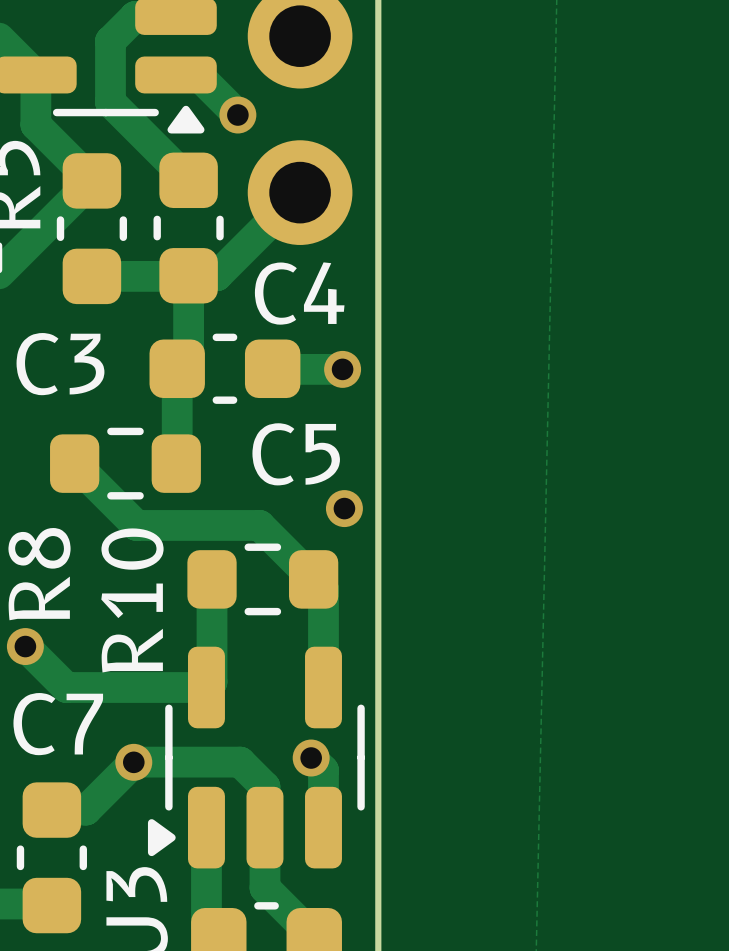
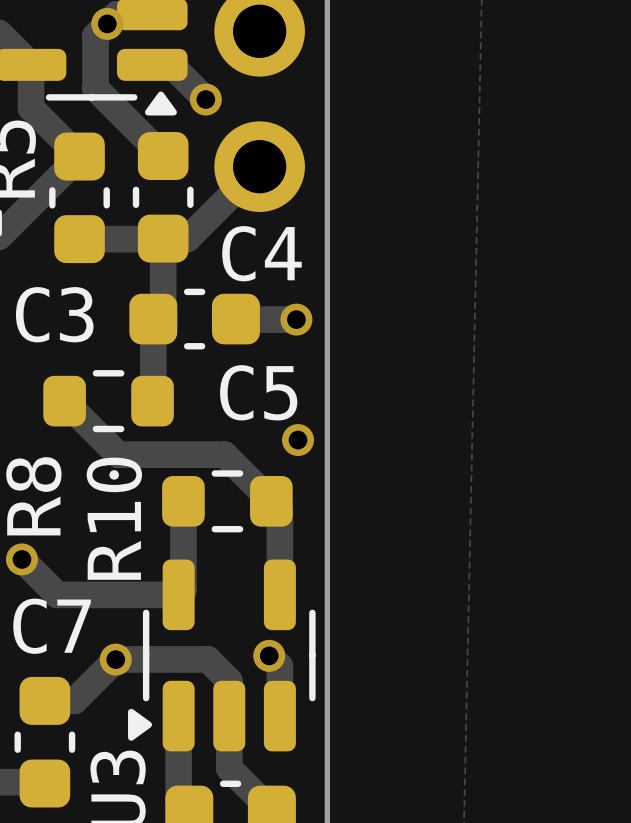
via: none -> (107, 23)

